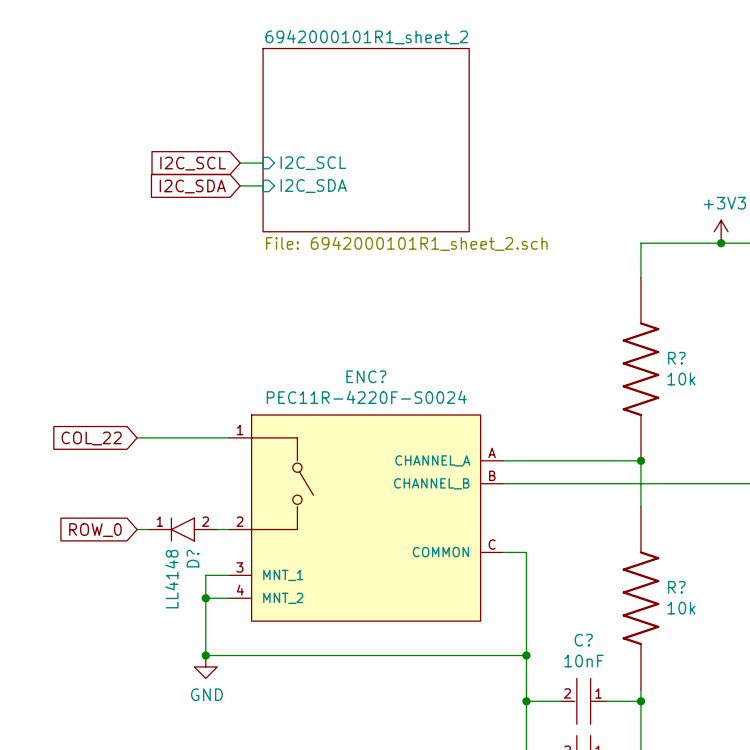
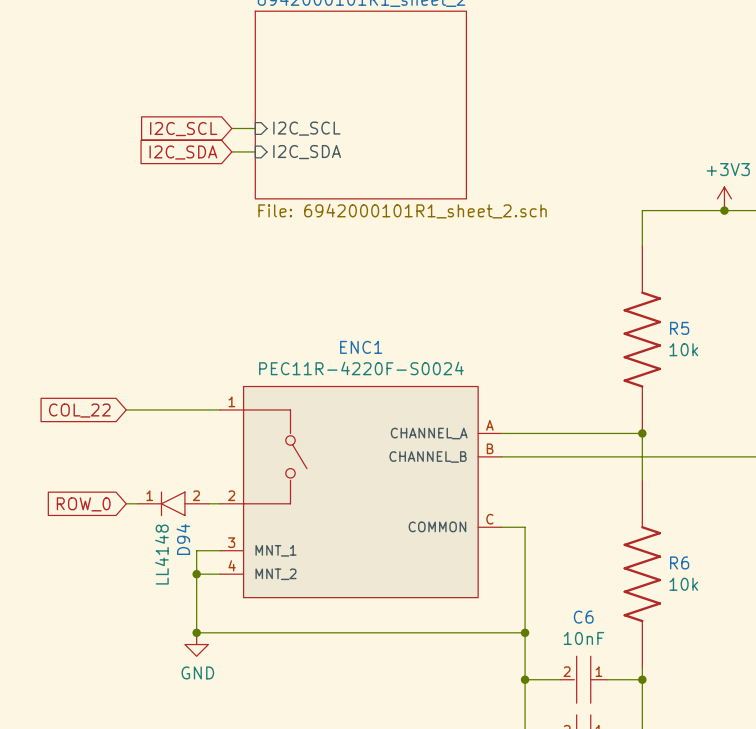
R? name: R? (676, 358) -> R5 (679, 328)
ENC? name: ENC? (366, 376) -> ENC1 (361, 347)
D? name: D? (192, 558) -> D94 (183, 539)
R? name: R? (676, 587) -> R6 (679, 562)
C? name: C? (583, 640) -> C6 (583, 617)

